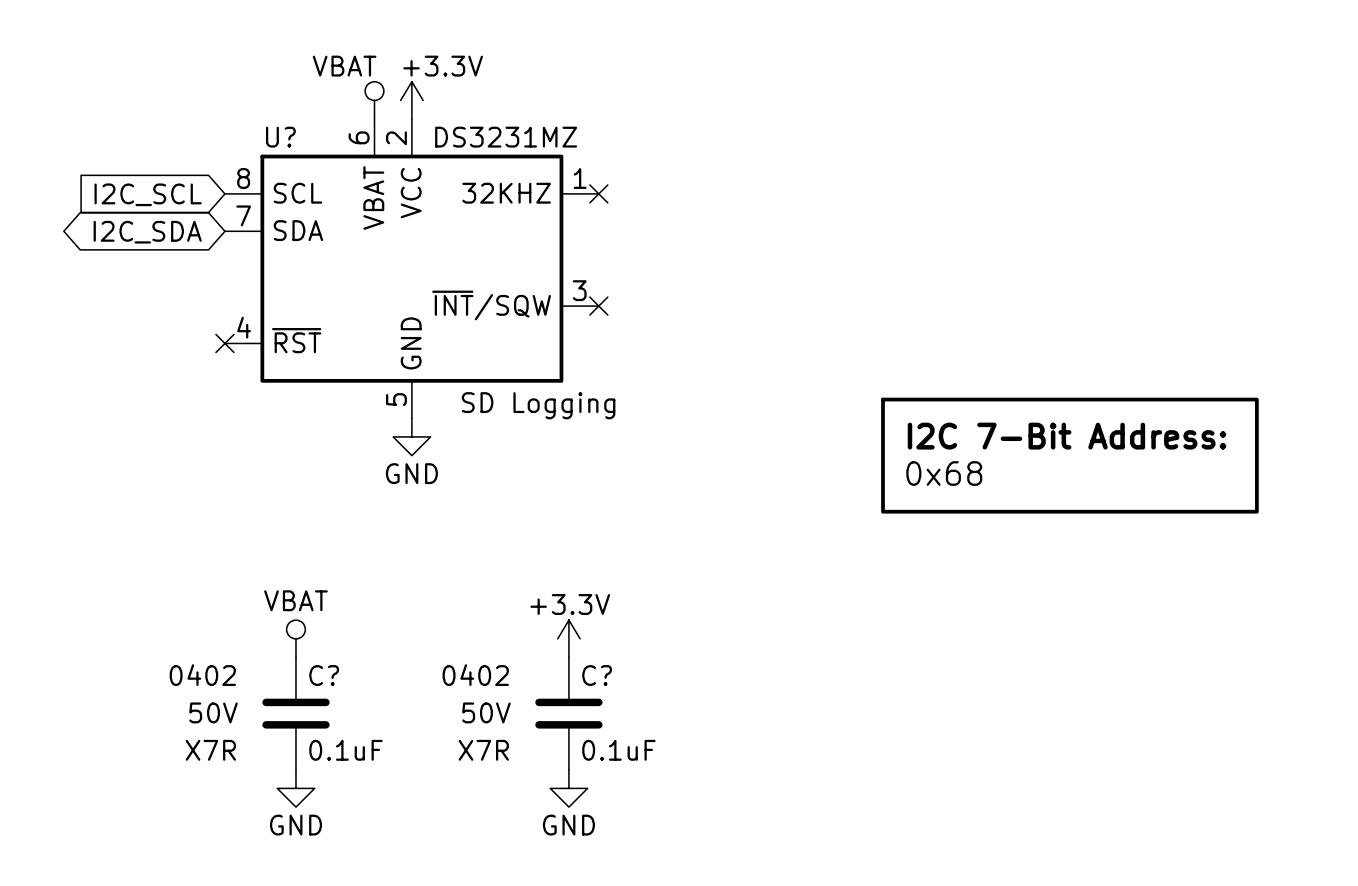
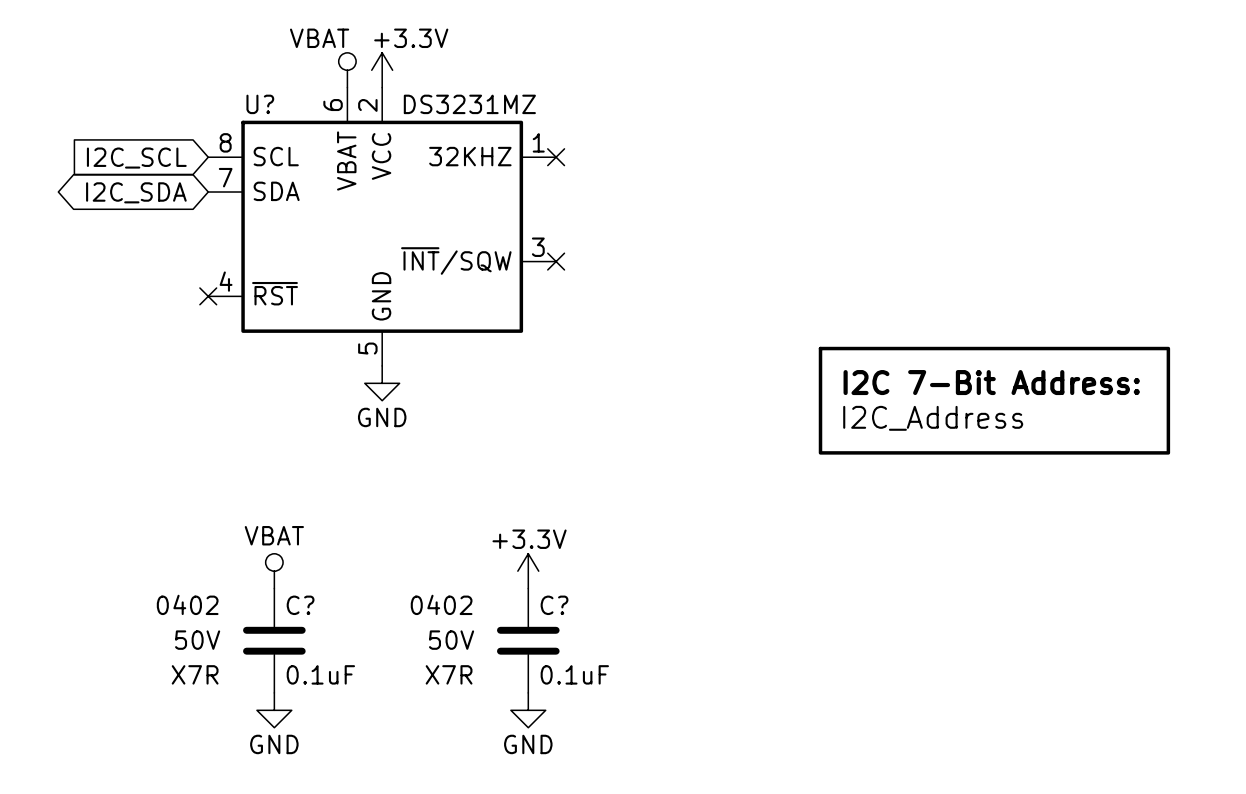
U? text: SD Logging (538, 405) -> none
part value: 0x68 (944, 473) -> I2C_Address (933, 418)

